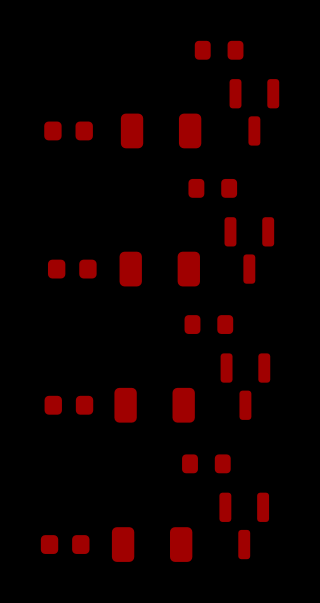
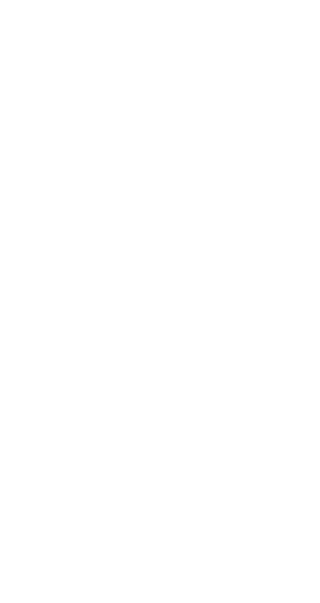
part: (219, 50) -> none
part: (254, 112) -> none
part: (68, 130) -> none
part: (161, 130) -> none
part: (212, 188) -> none
part: (249, 250) -> none
part: (72, 269) -> none
part: (159, 269) -> none
part: (208, 324) -> none
part: (245, 386) -> none
part: (68, 405) -> none
part: (154, 405) -> none
part: (206, 463) -> none
part: (244, 525) -> none
part: (65, 544) -> none
part: (152, 544) -> none

